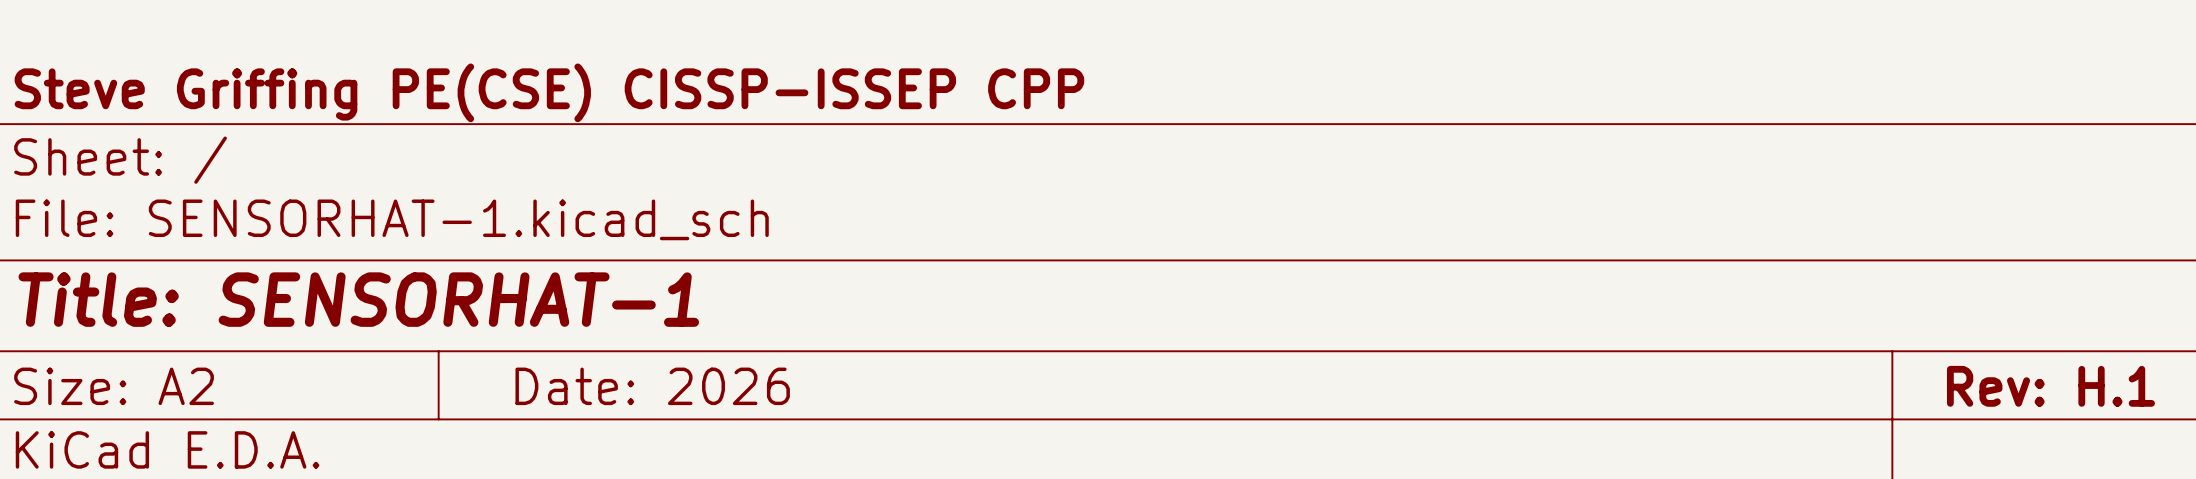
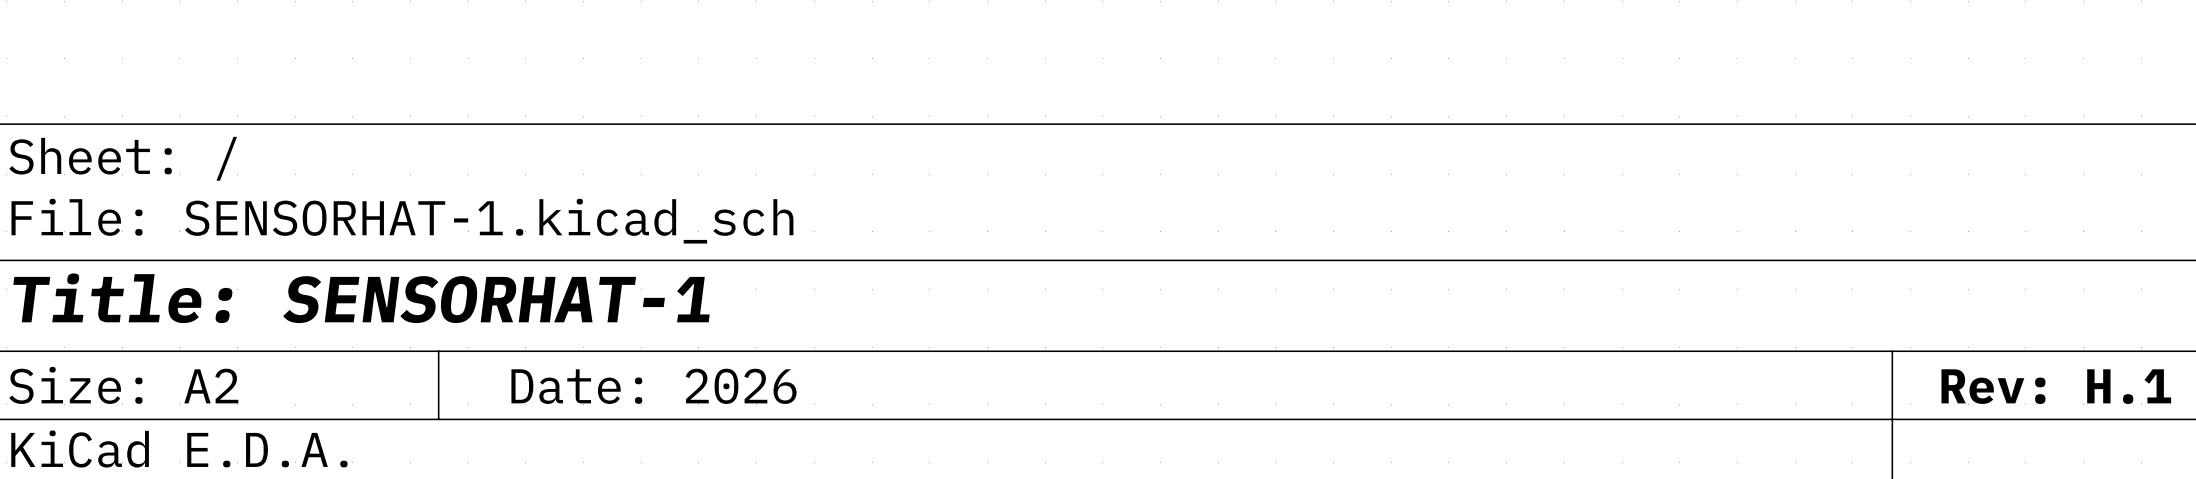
title block: Steve Griffing PE(CSE) CISSP-ISSEP CPP (549, 92) -> none

